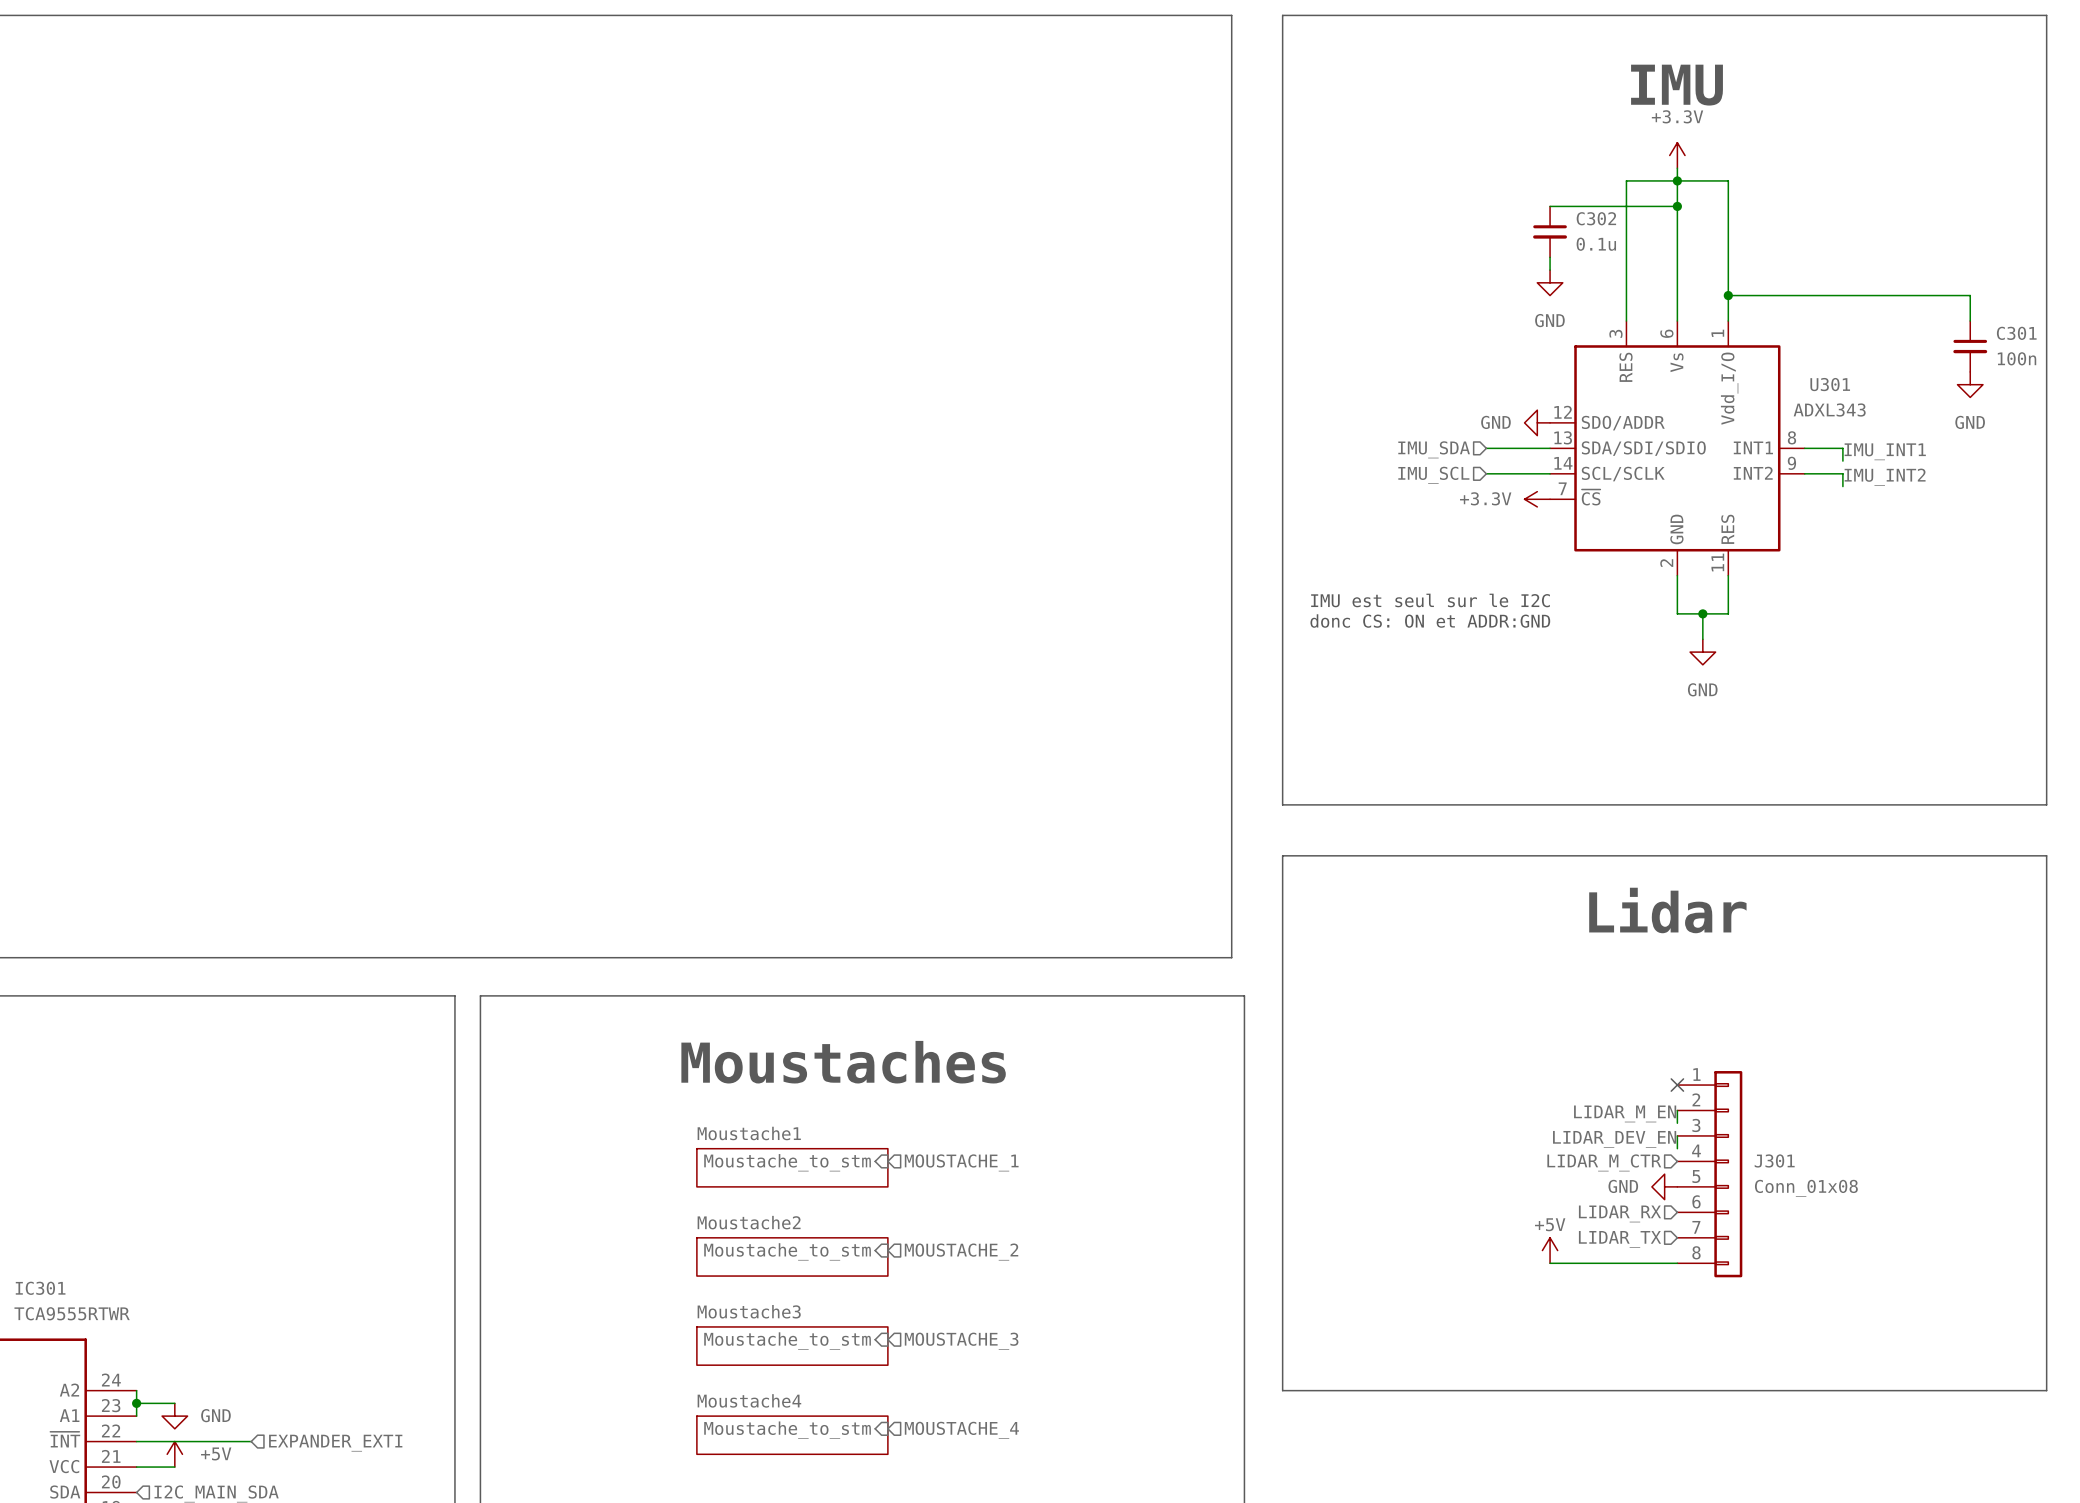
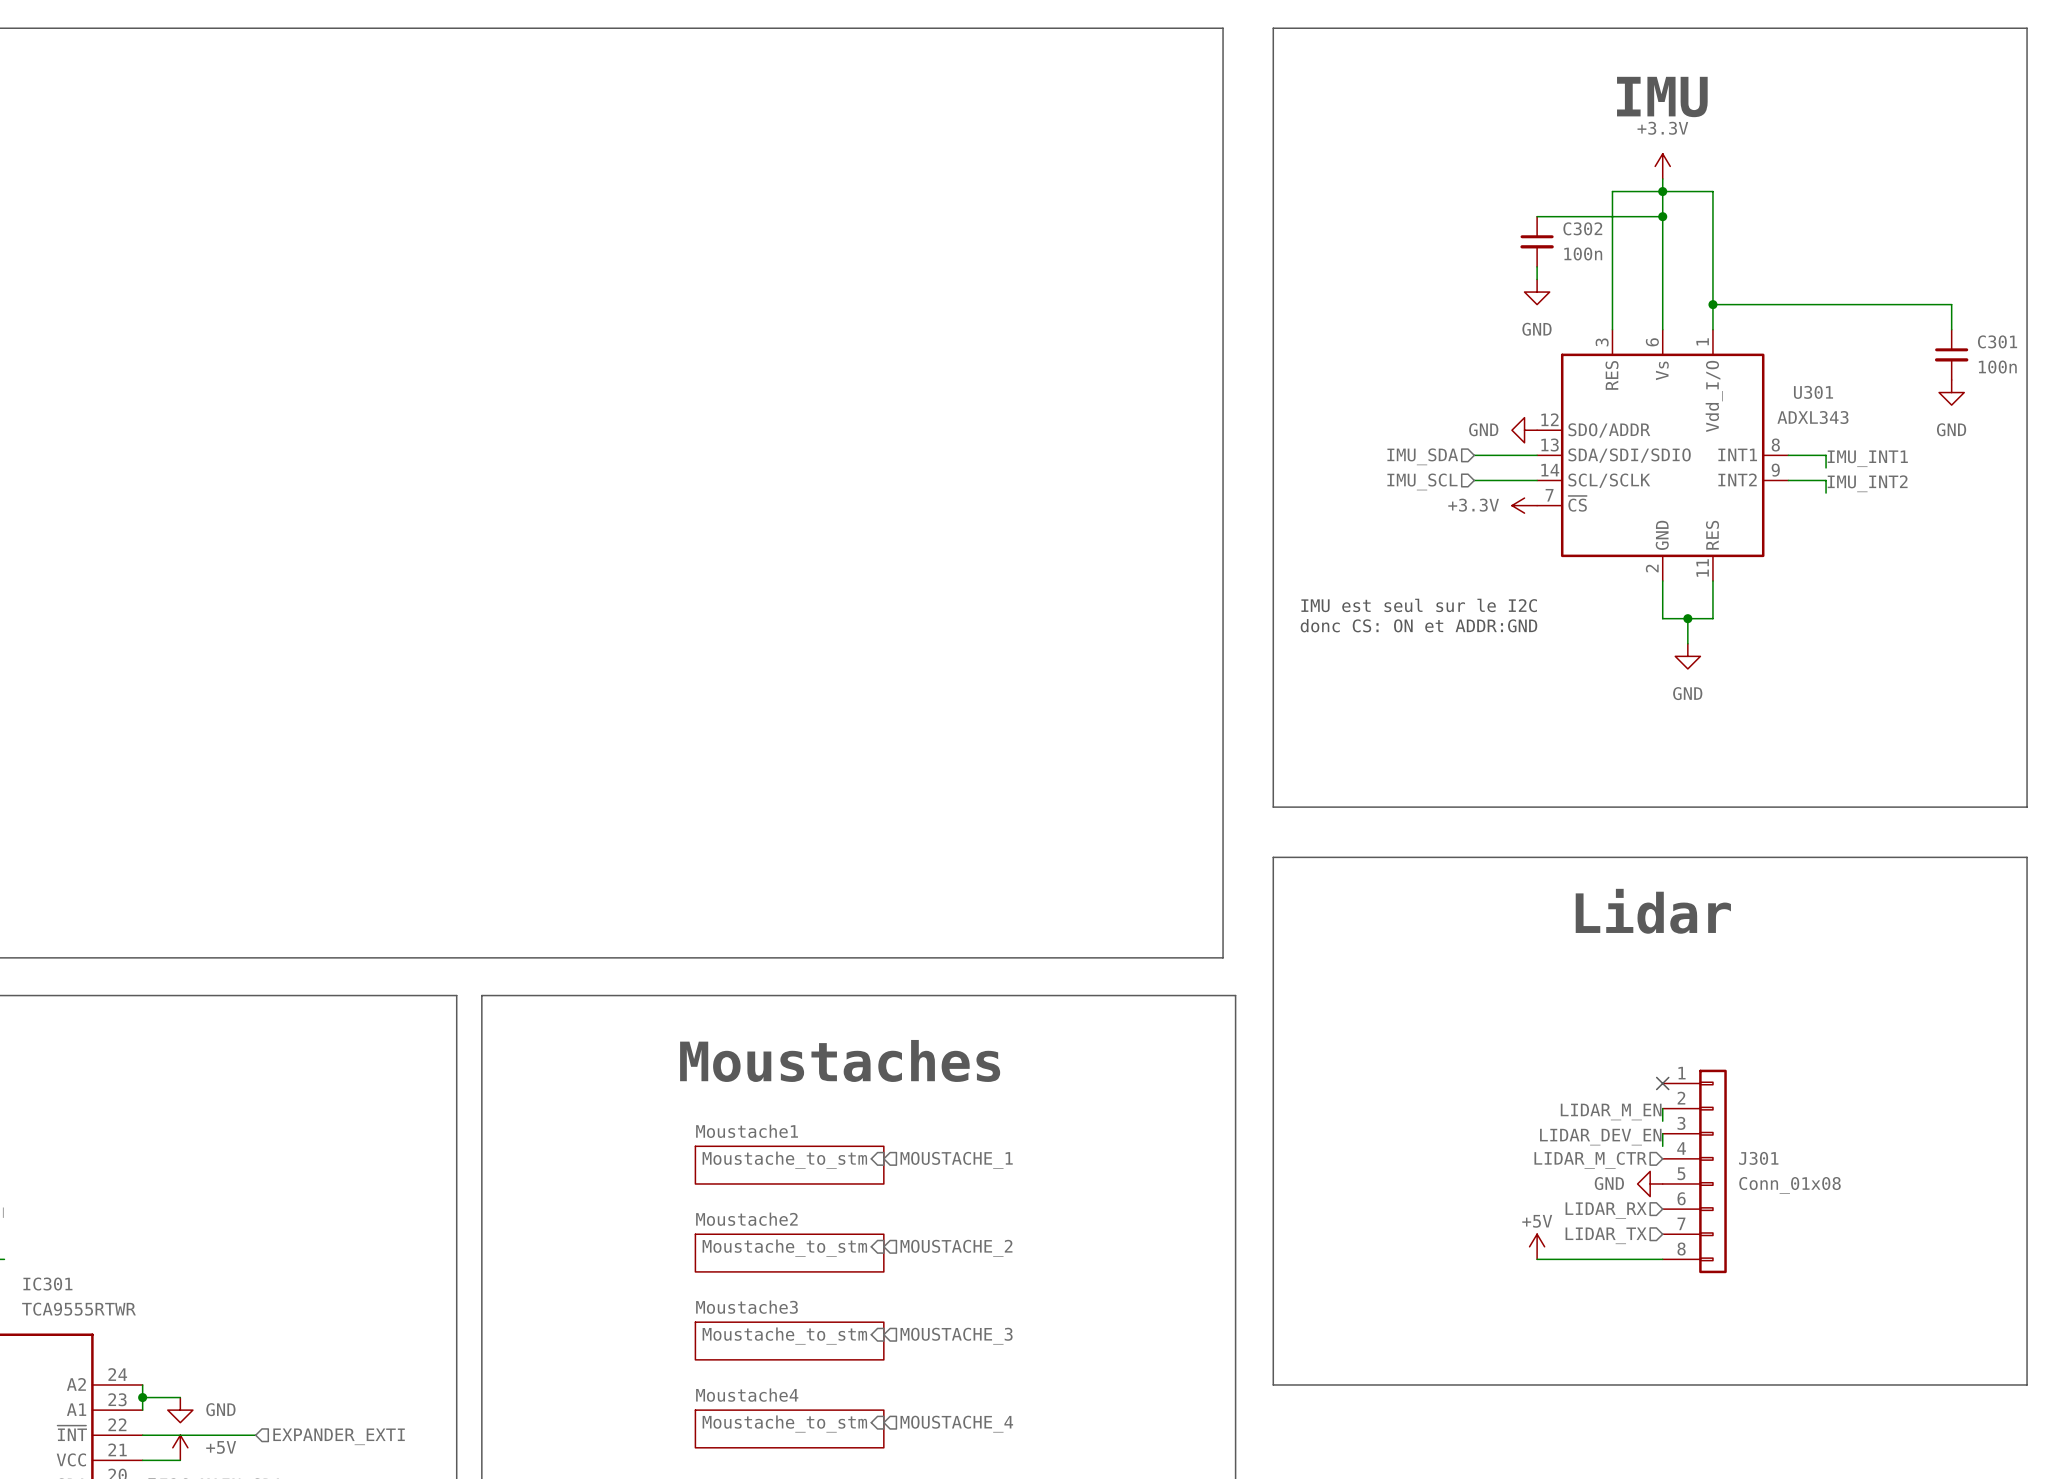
C302 value: 0.1u (1596, 244) -> 100n (1583, 253)

